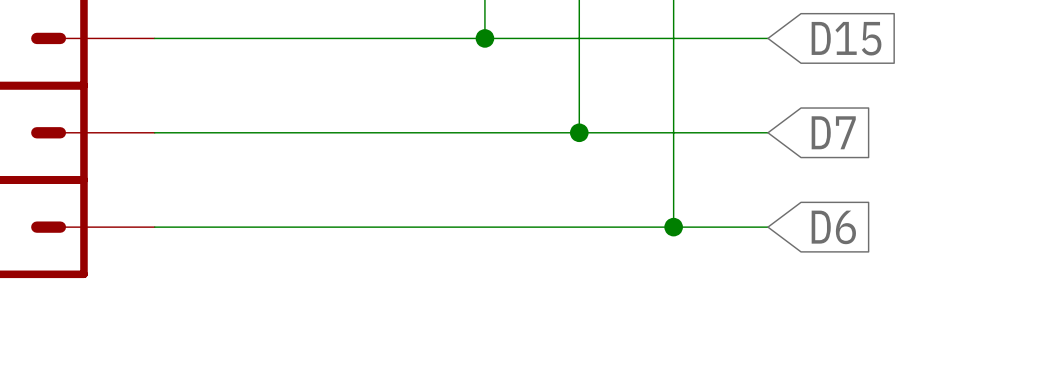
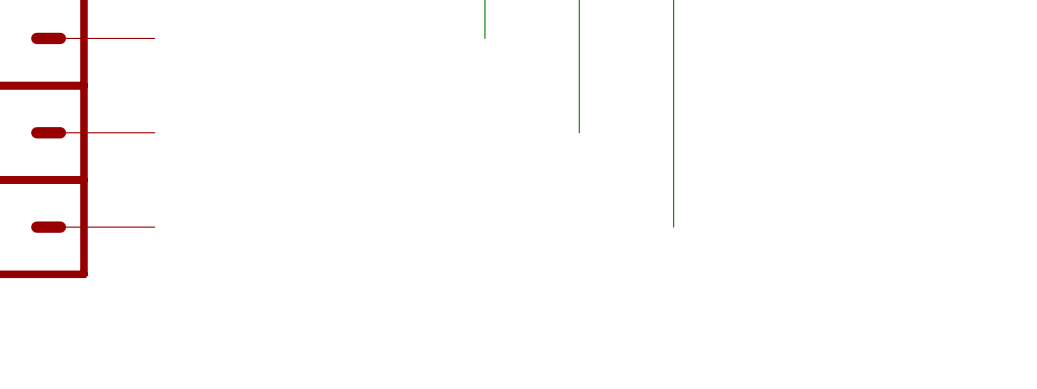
wire: (154, 38) (767, 38) -> none
junction: (484, 38) -> none
global label: D15 (846, 38) -> none
wire: (154, 132) (767, 132) -> none
junction: (579, 132) -> none
global label: D7 (833, 132) -> none
wire: (154, 227) (767, 227) -> none
junction: (673, 227) -> none
global label: D6 (833, 227) -> none

